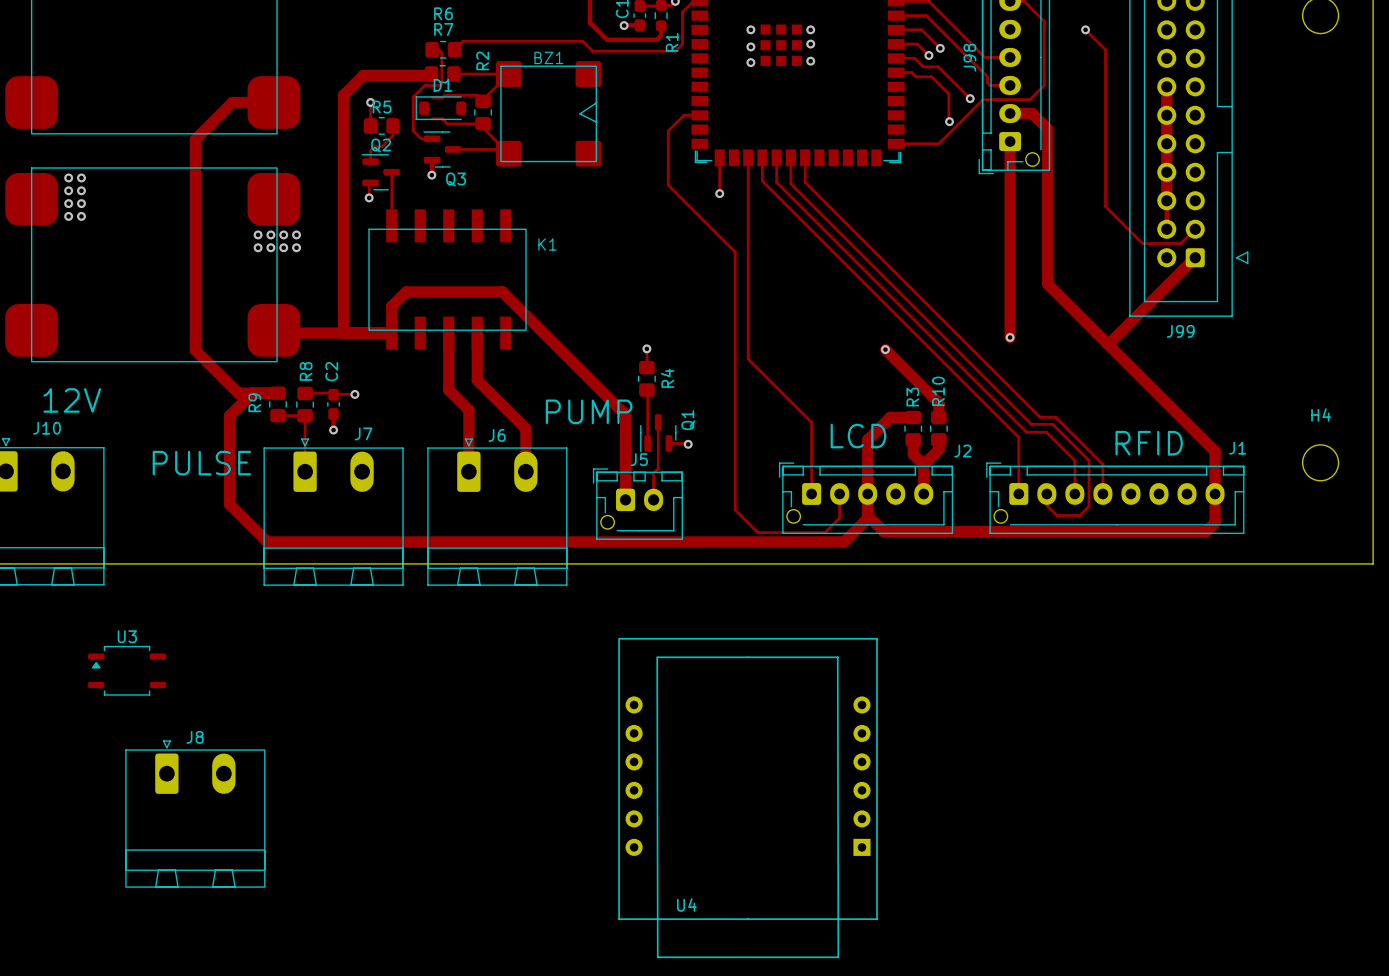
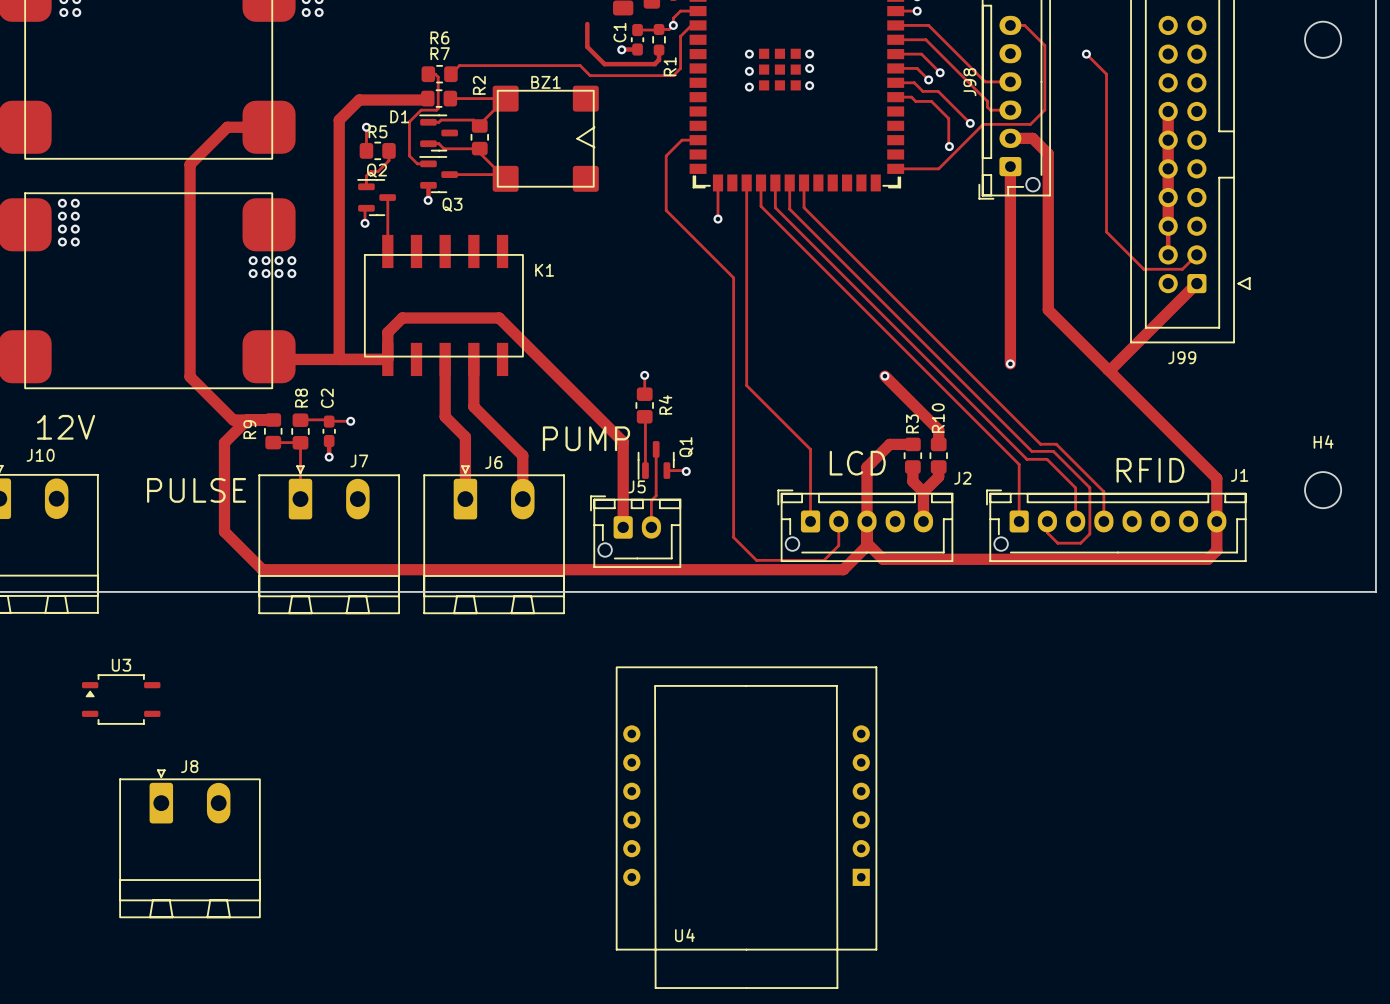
D1 name position: D1 (442, 85) -> D1 (399, 116)
D1 footprint: [415, 96, 467, 121] -> [419, 114, 458, 152]

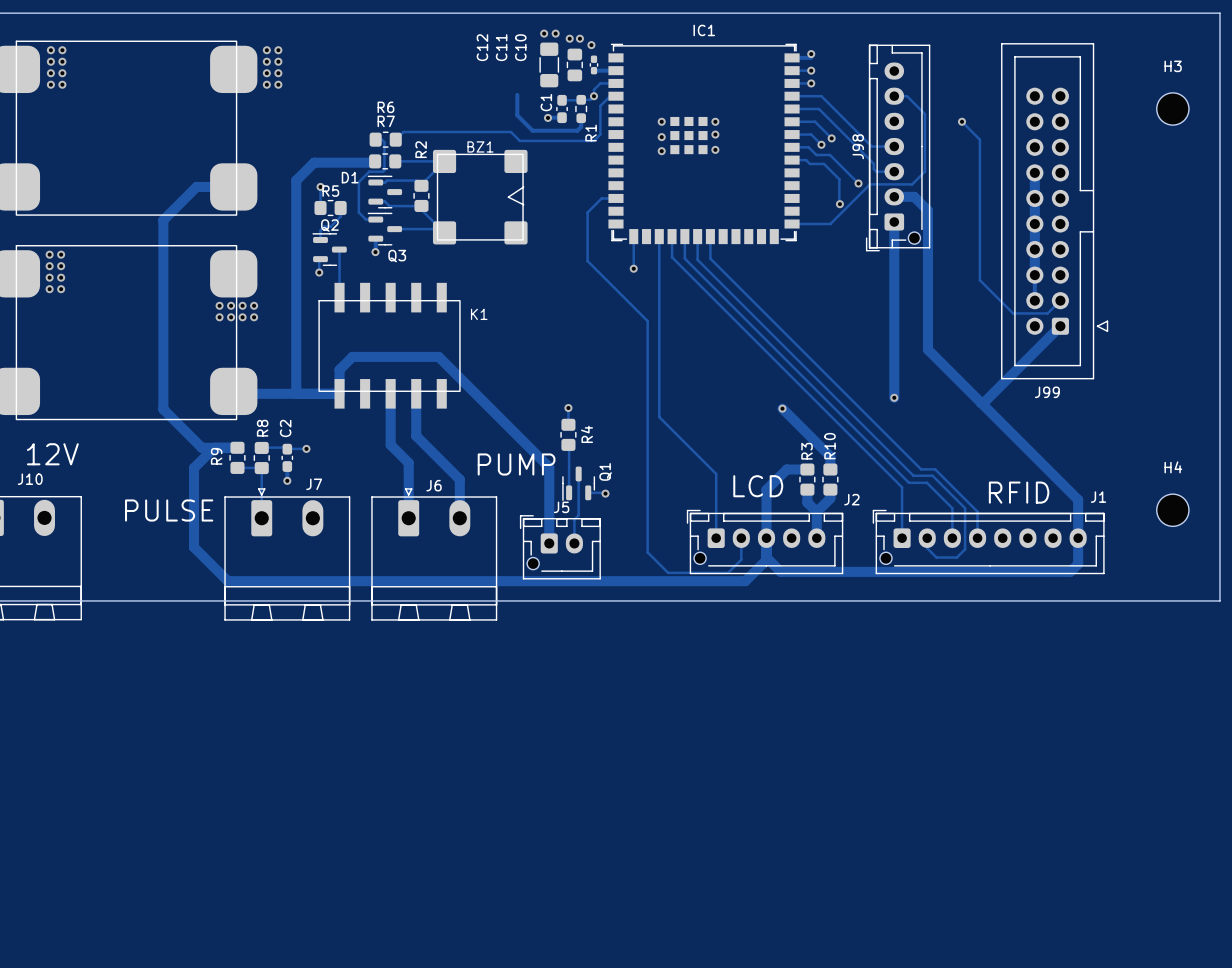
U3: (121, 699) -> none
U4: (746, 827) -> none
J8: (190, 843) -> none

